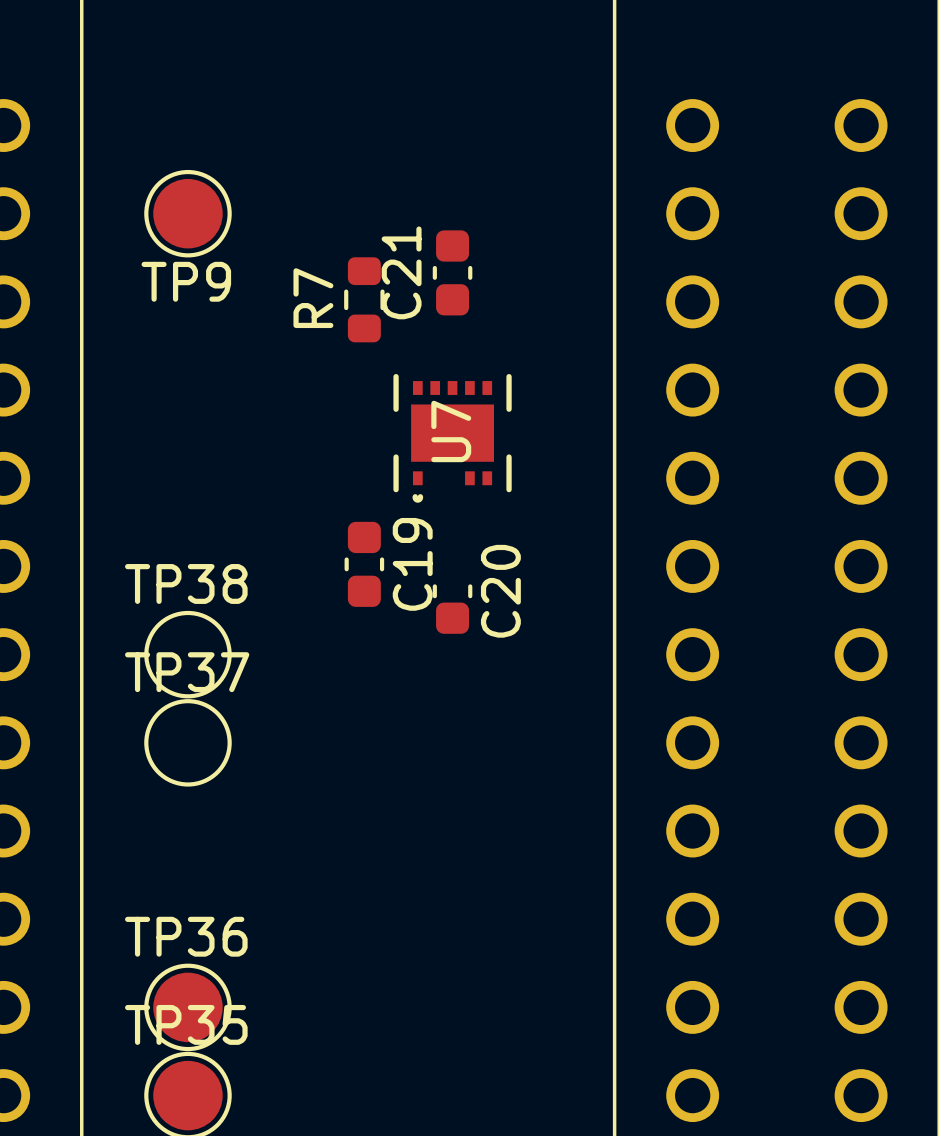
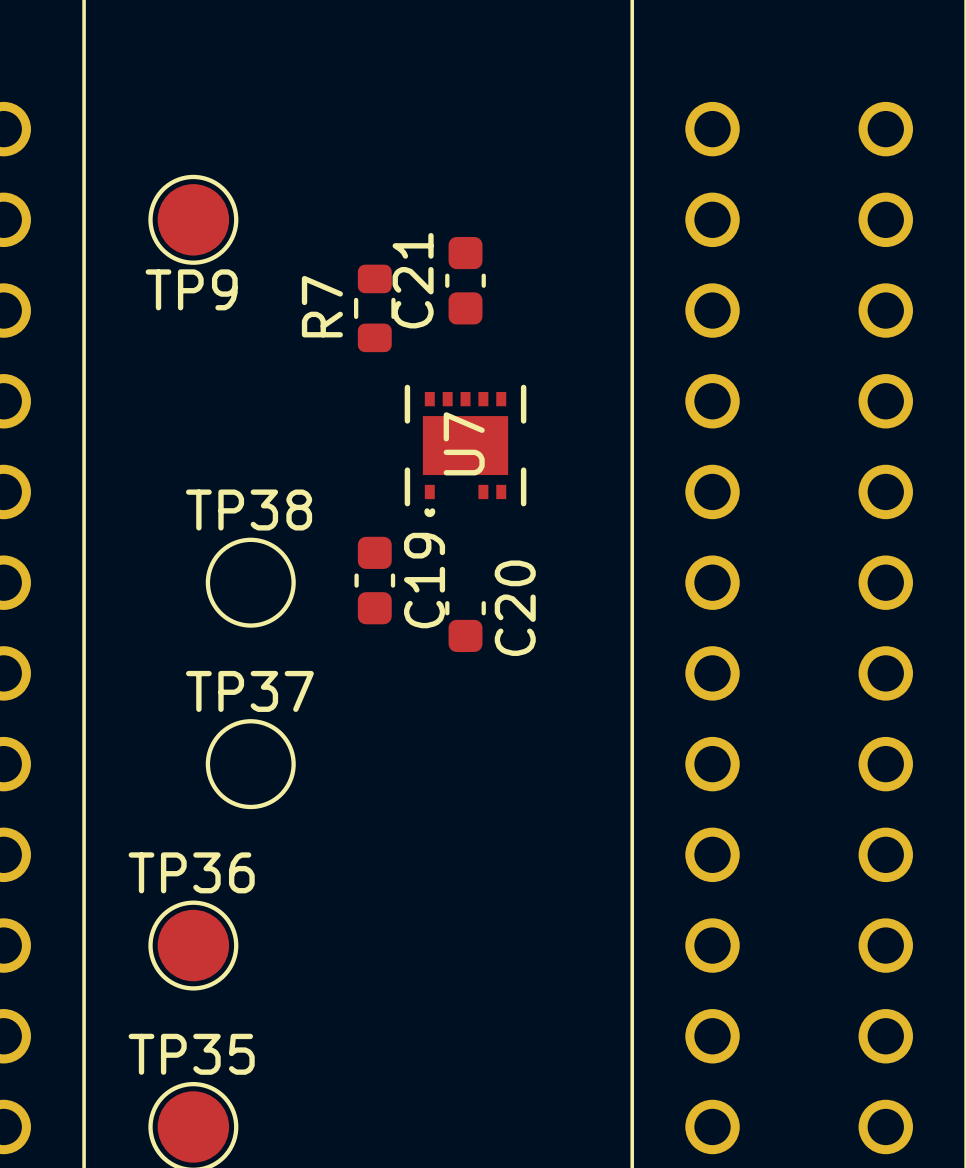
TP38 position: (187, 654) -> (250, 582)
TP37 position: (187, 742) -> (250, 764)
TP36 position: (187, 1007) -> (193, 945)

